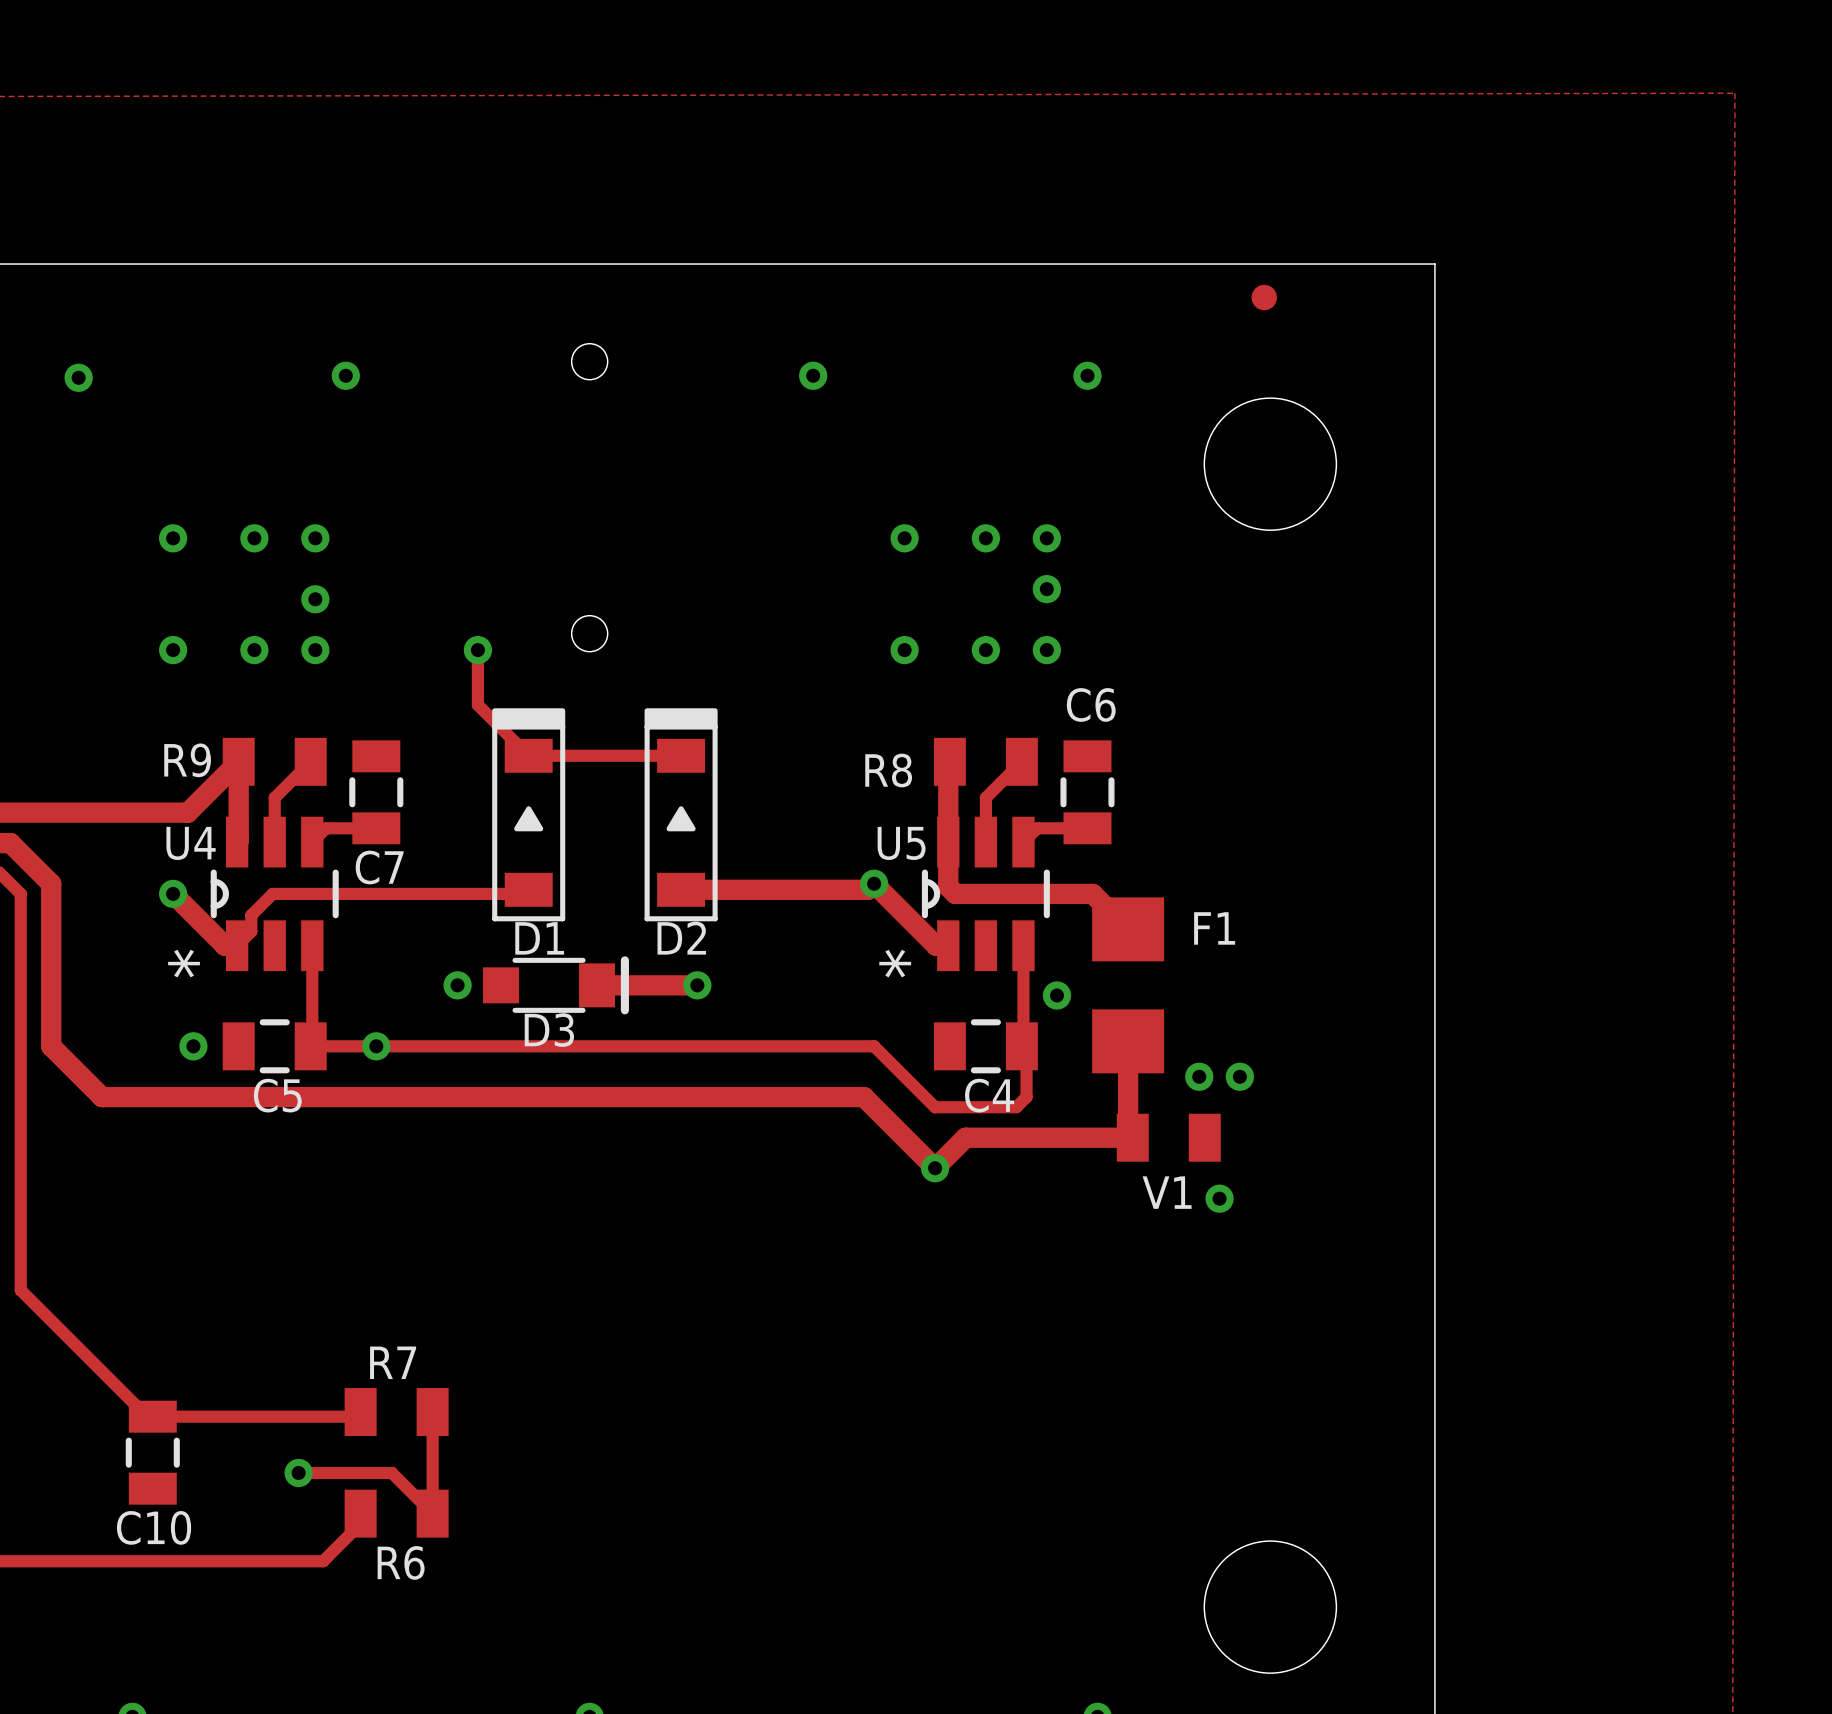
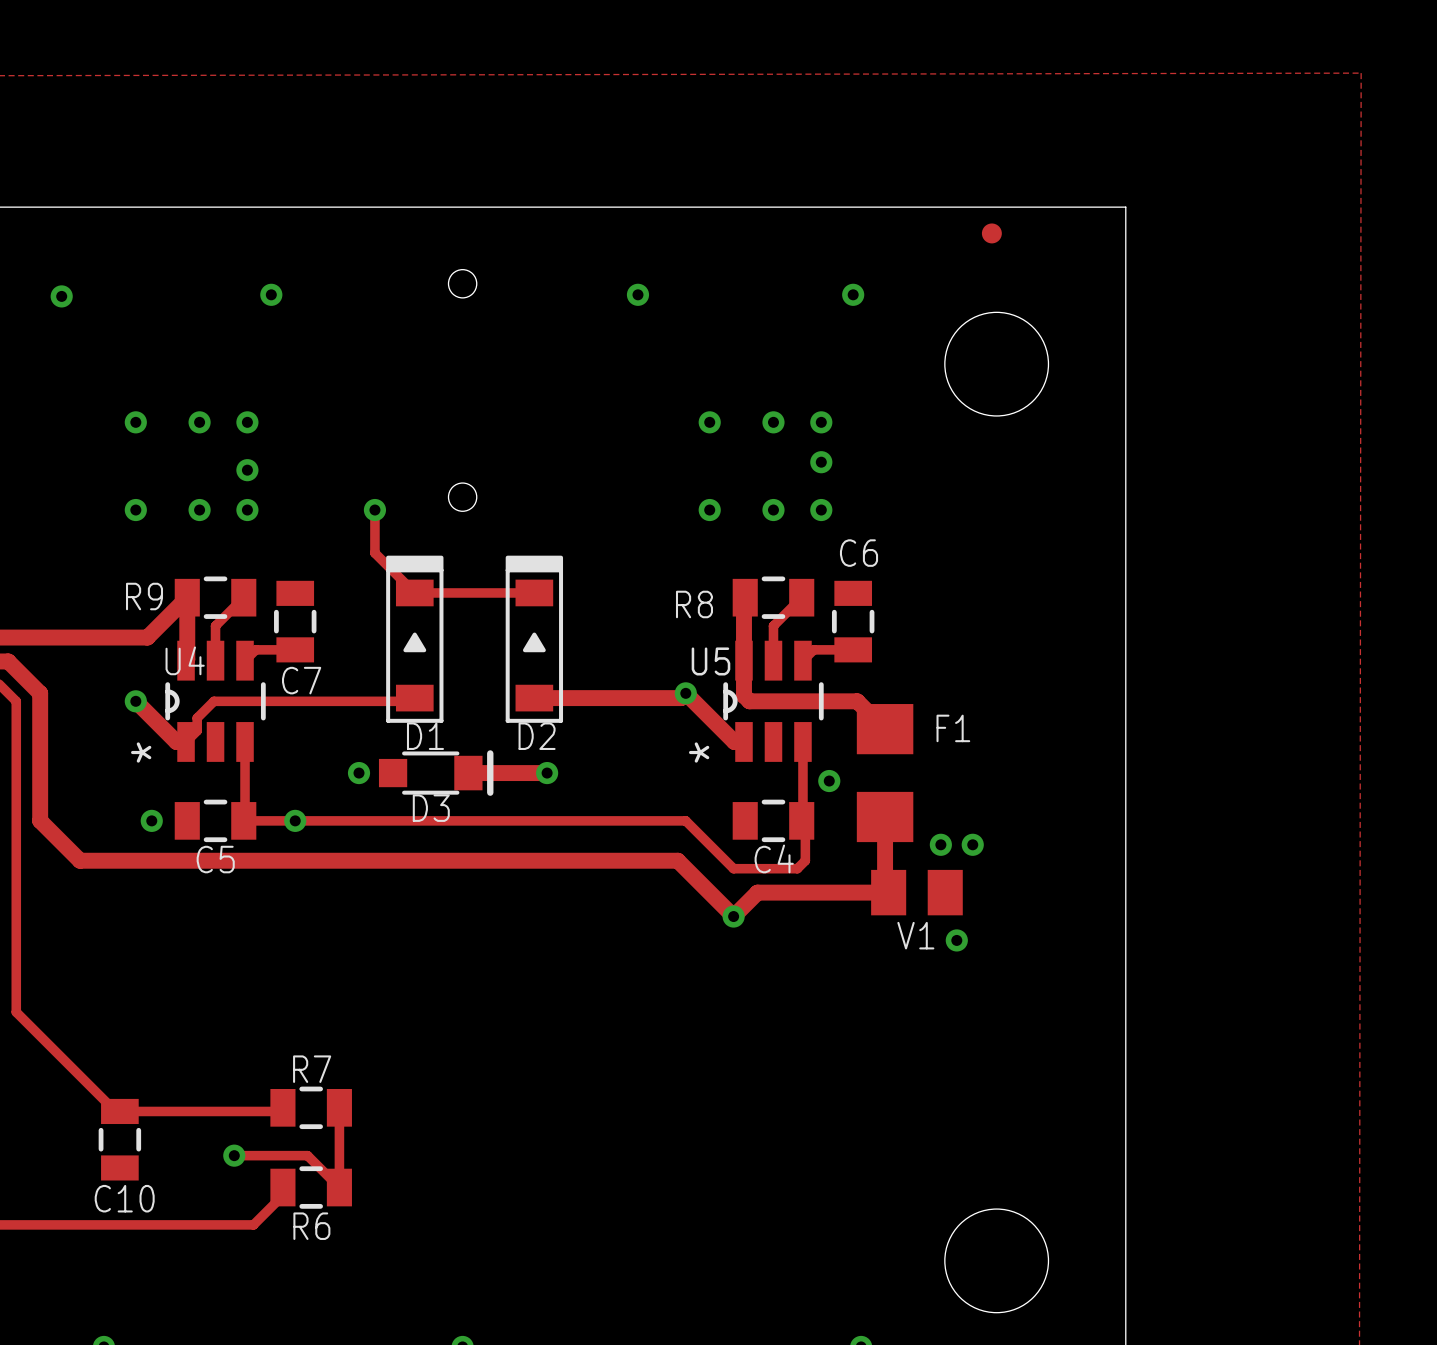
R9 footprint: [222, 737, 327, 786] -> [174, 576, 257, 619]
R8 footprint: [933, 737, 1038, 786] -> [732, 576, 815, 619]
U4 name position: U4 (191, 843) -> U4 (185, 660)
V1 footprint: [1116, 1113, 1221, 1162] -> [871, 869, 963, 916]
R7 footprint: [344, 1388, 449, 1437] -> [270, 1086, 352, 1130]
R6 footprint: [344, 1489, 449, 1538] -> [270, 1166, 352, 1209]

